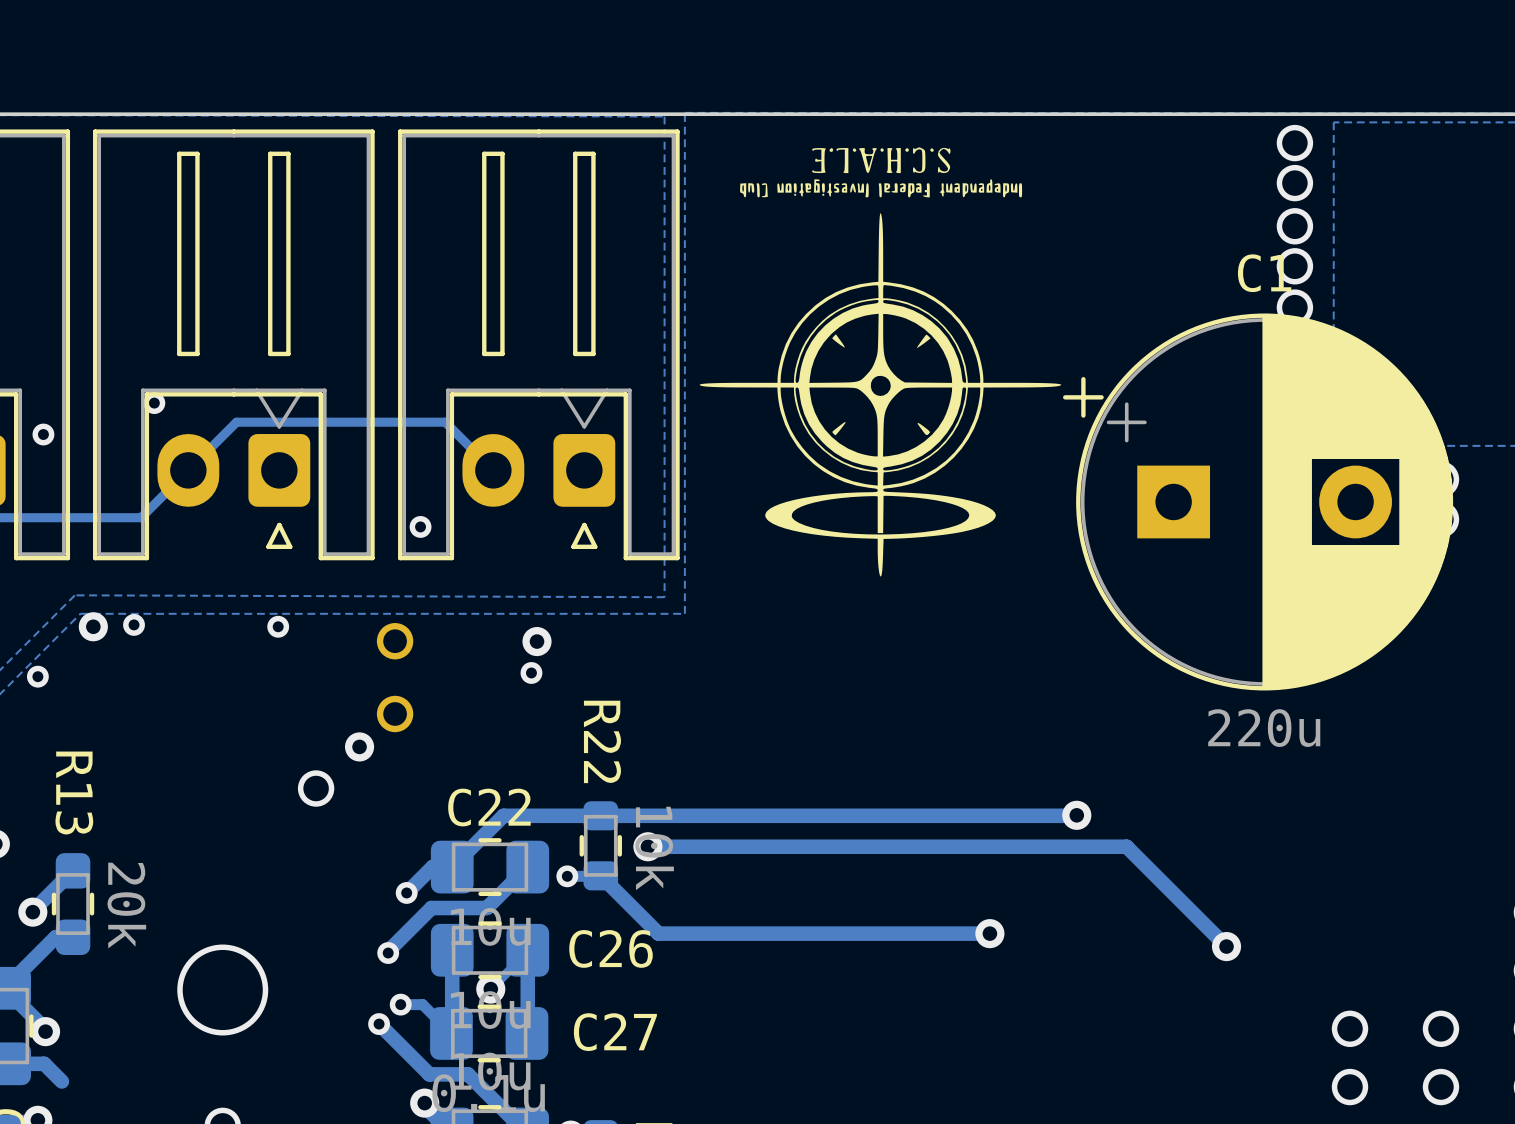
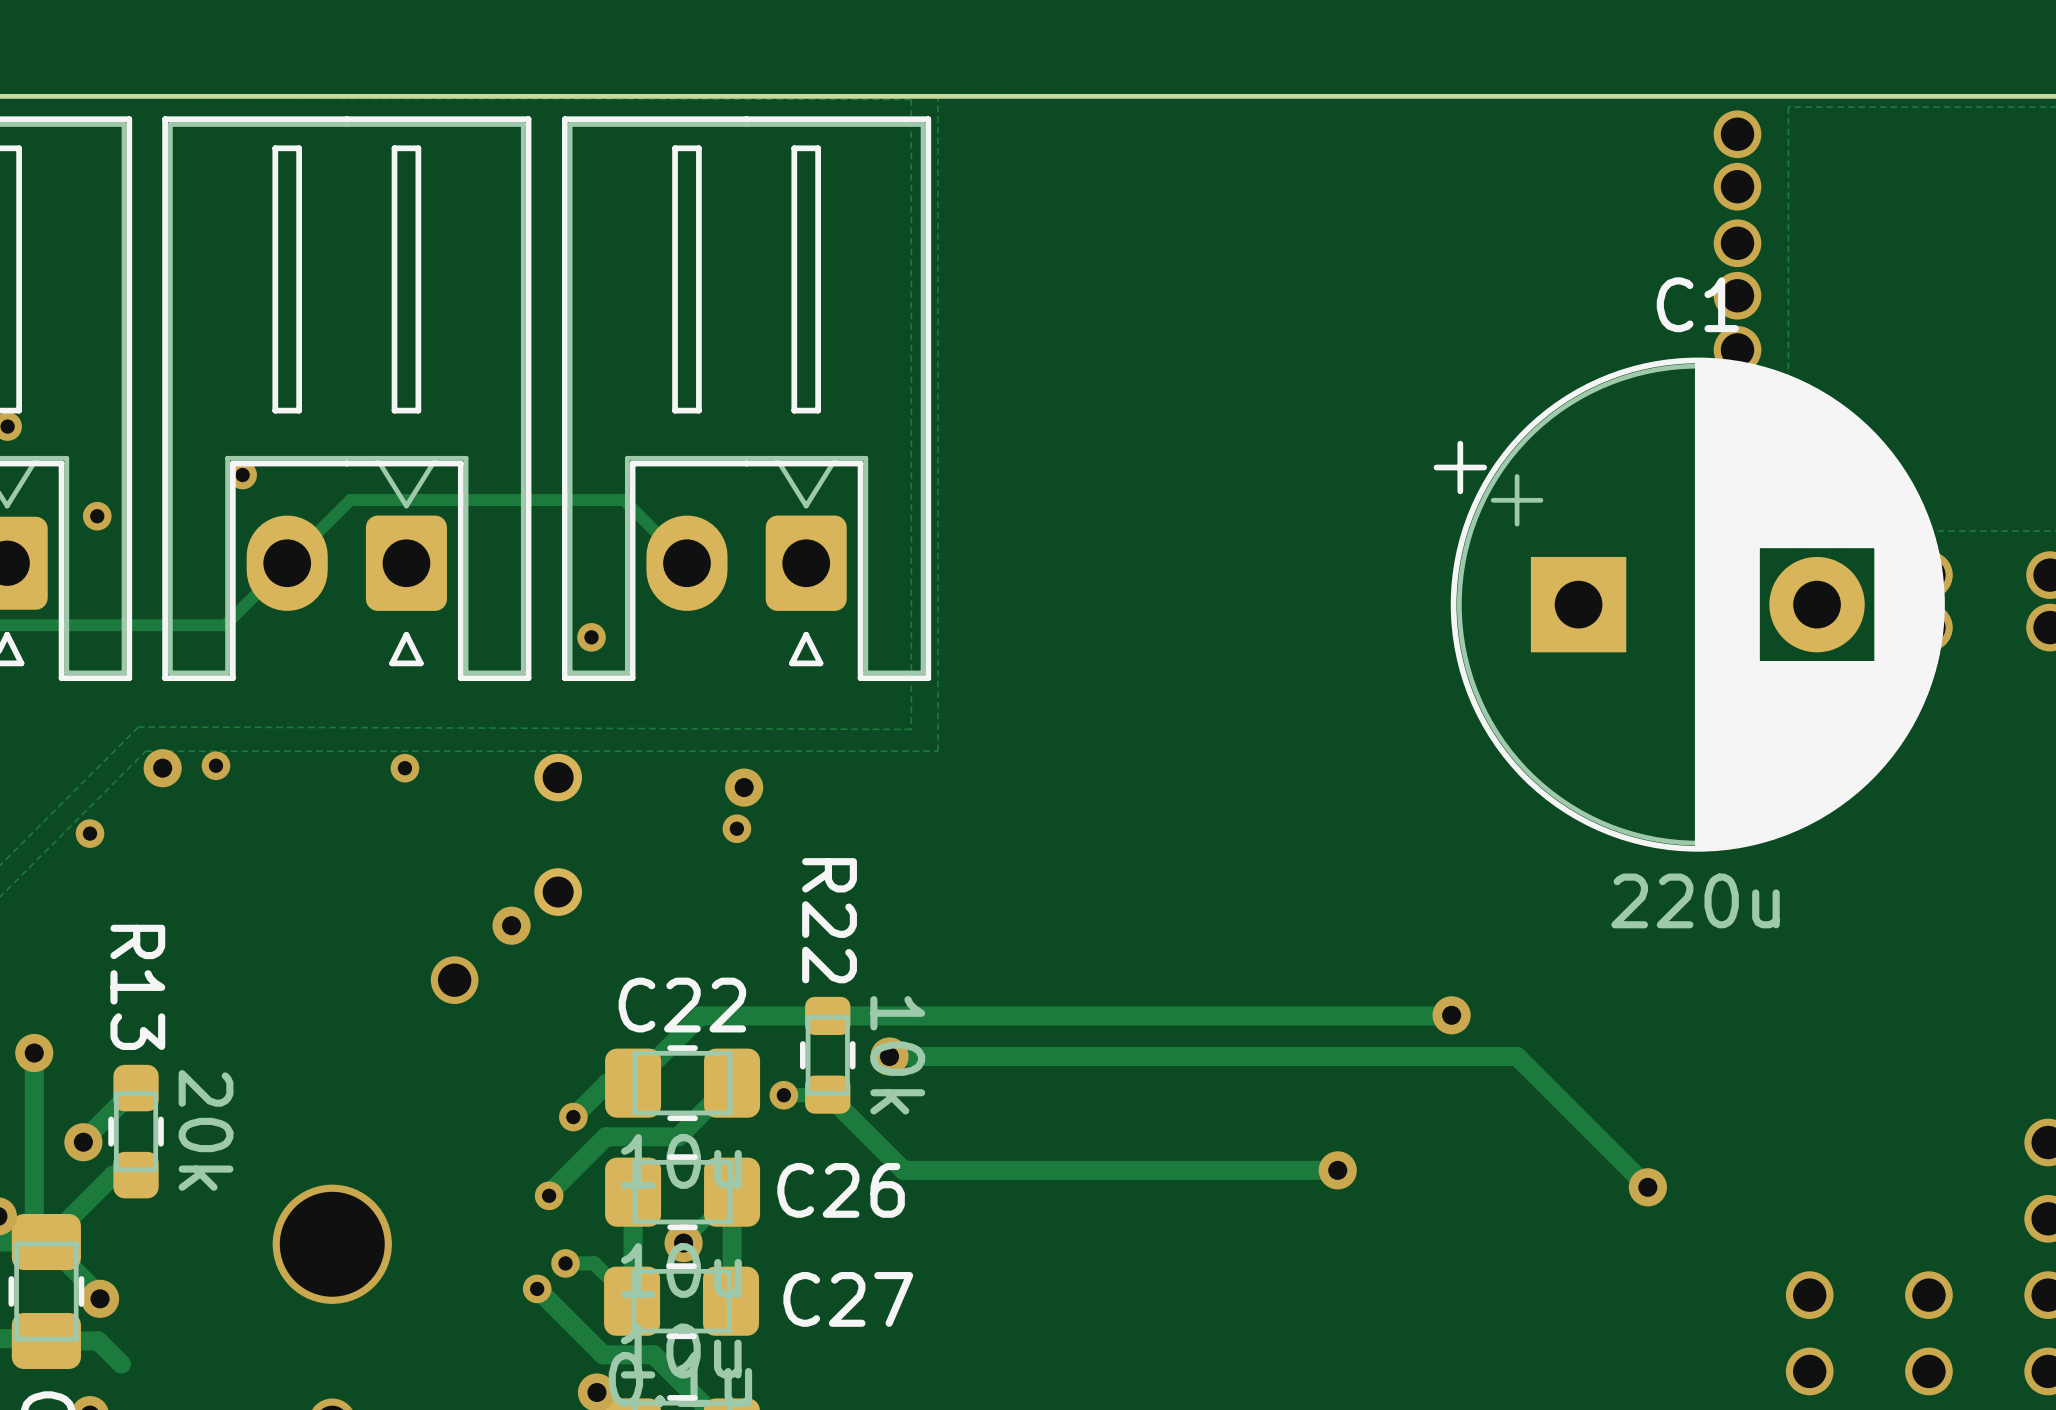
drawing: [699, 147, 1062, 577] -> none
part footprint: [376, 623, 414, 733] -> [534, 753, 583, 916]

